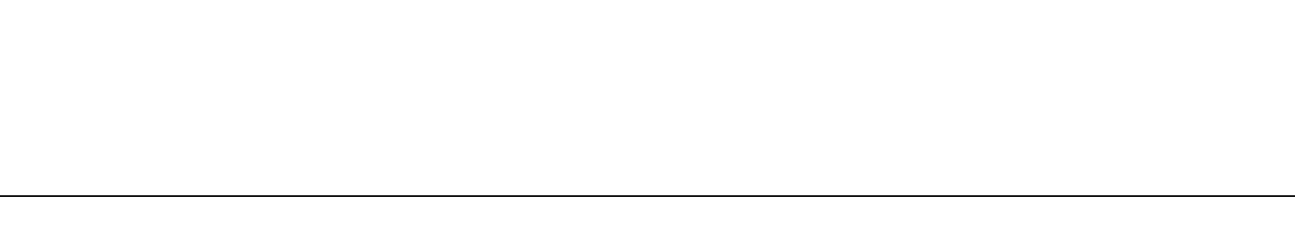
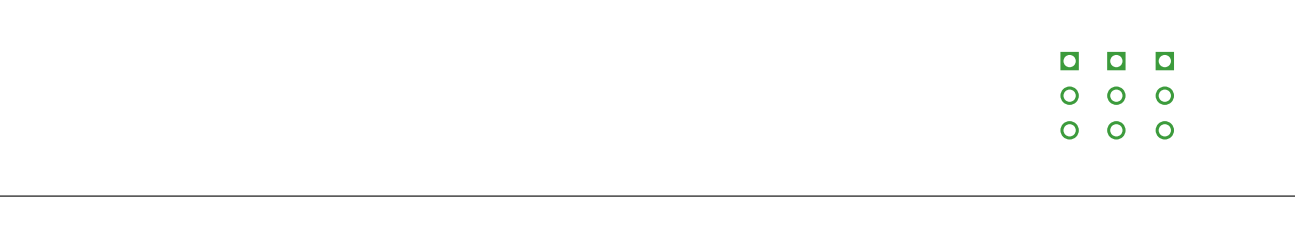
part: none -> (1069, 95)
part: none -> (1116, 95)
part: none -> (1164, 95)

